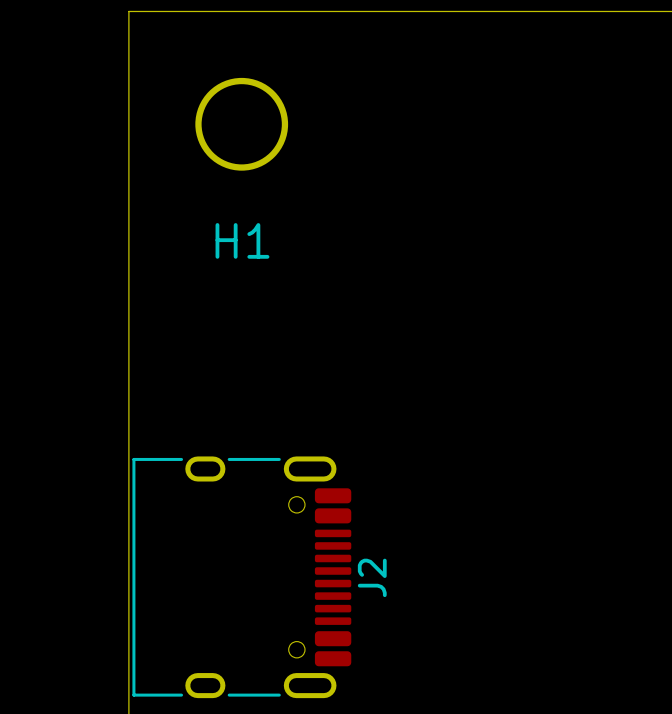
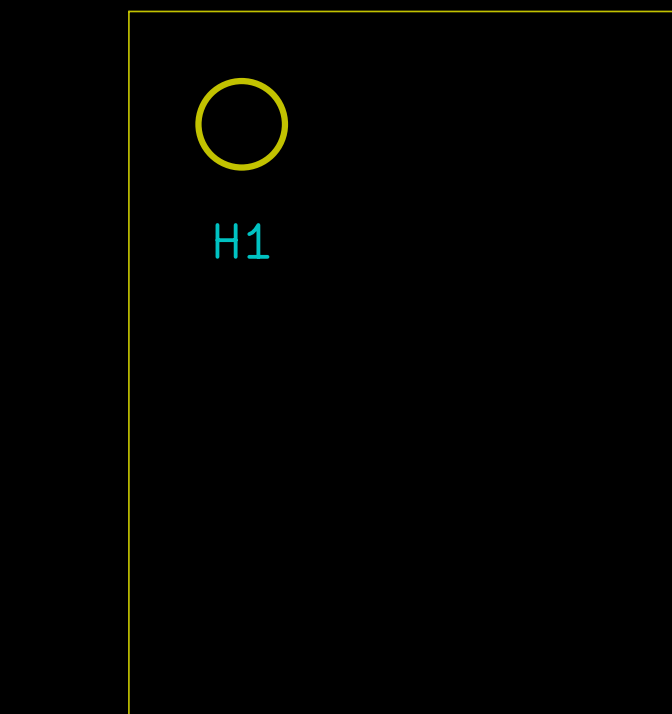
J2: (241, 577) -> none

